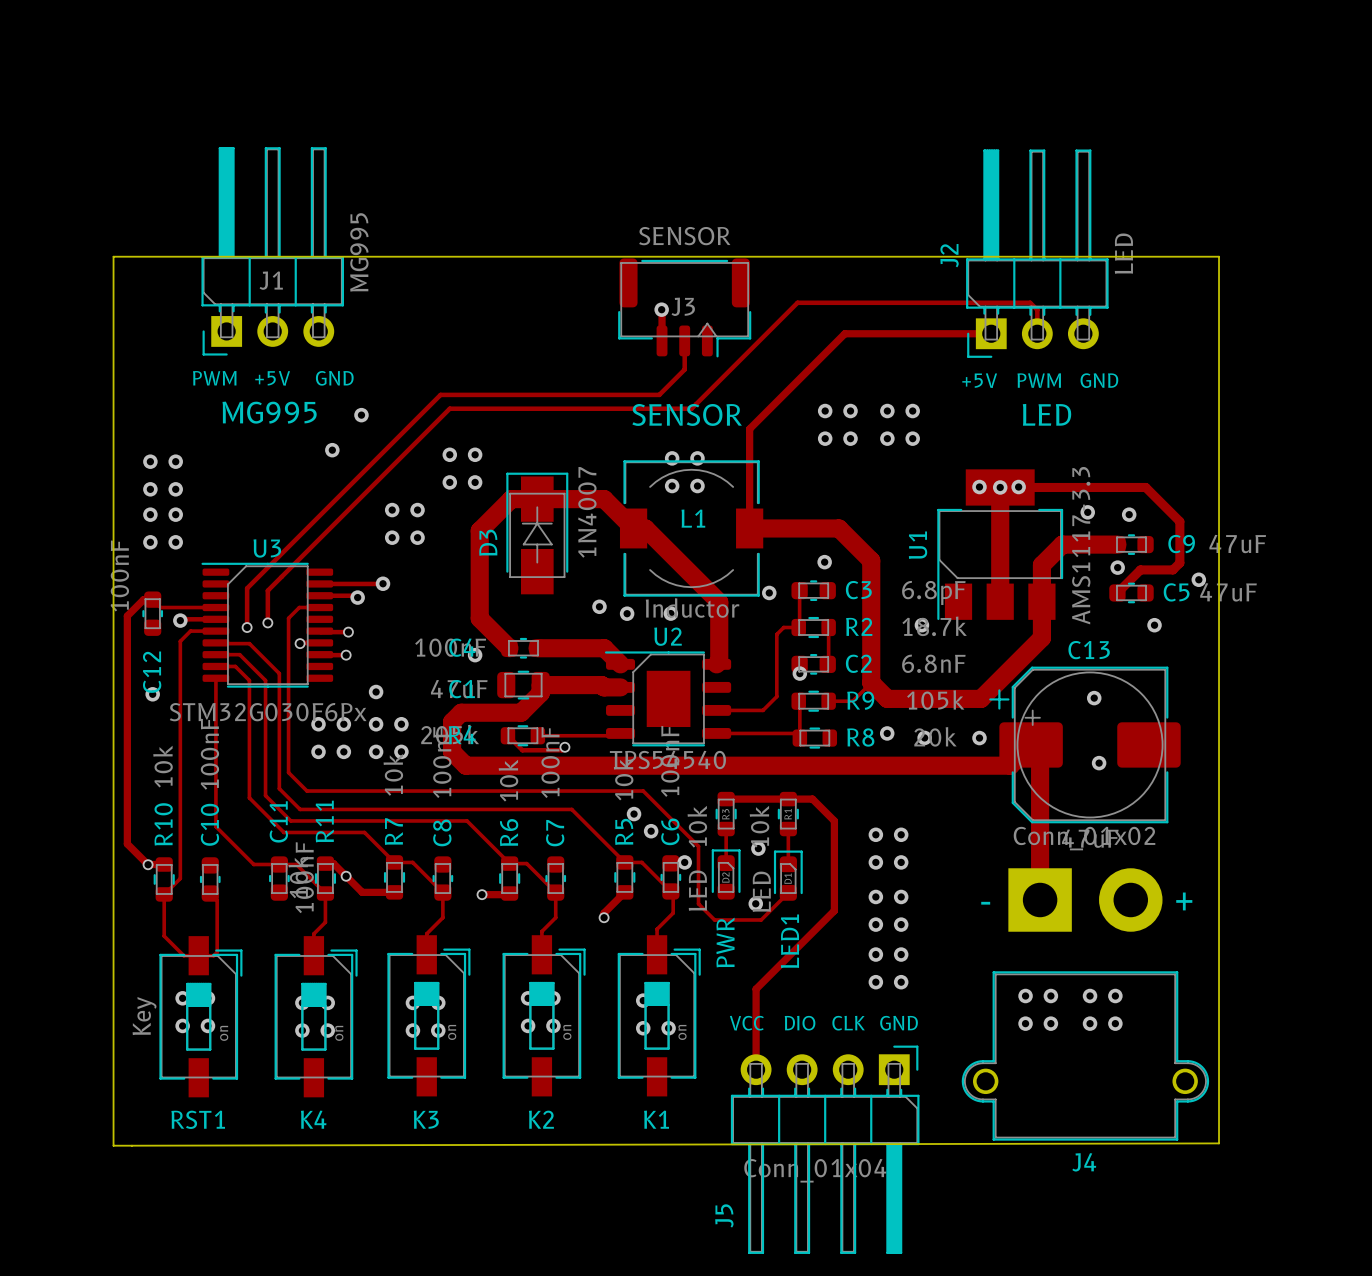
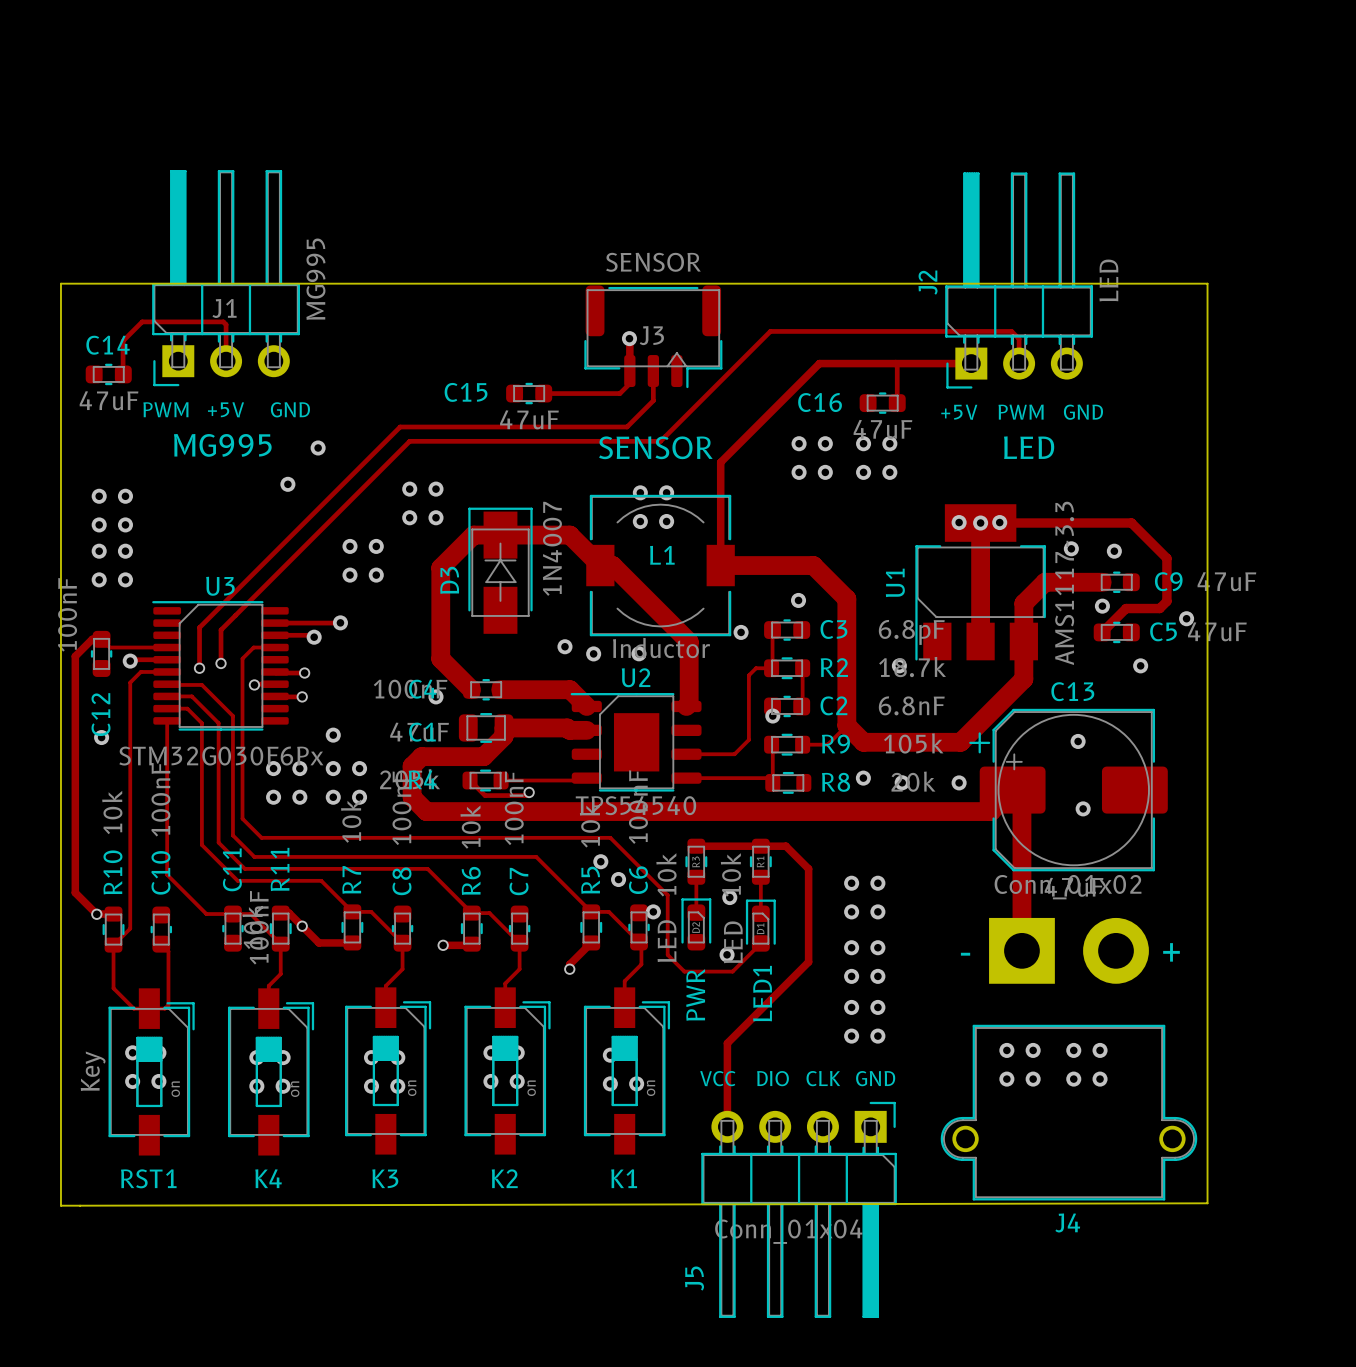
track: none -> (226, 361) (226, 324) (223, 321) (142, 321) (123, 341) (123, 374)
track: none -> (895, 363) (897, 403)
track: none -> (629, 371) (629, 383) (619, 393) (543, 393)
C14: none -> 47uF (108, 374)
C15: none -> 47uF (529, 393)
C16: none -> 47uF (882, 403)

